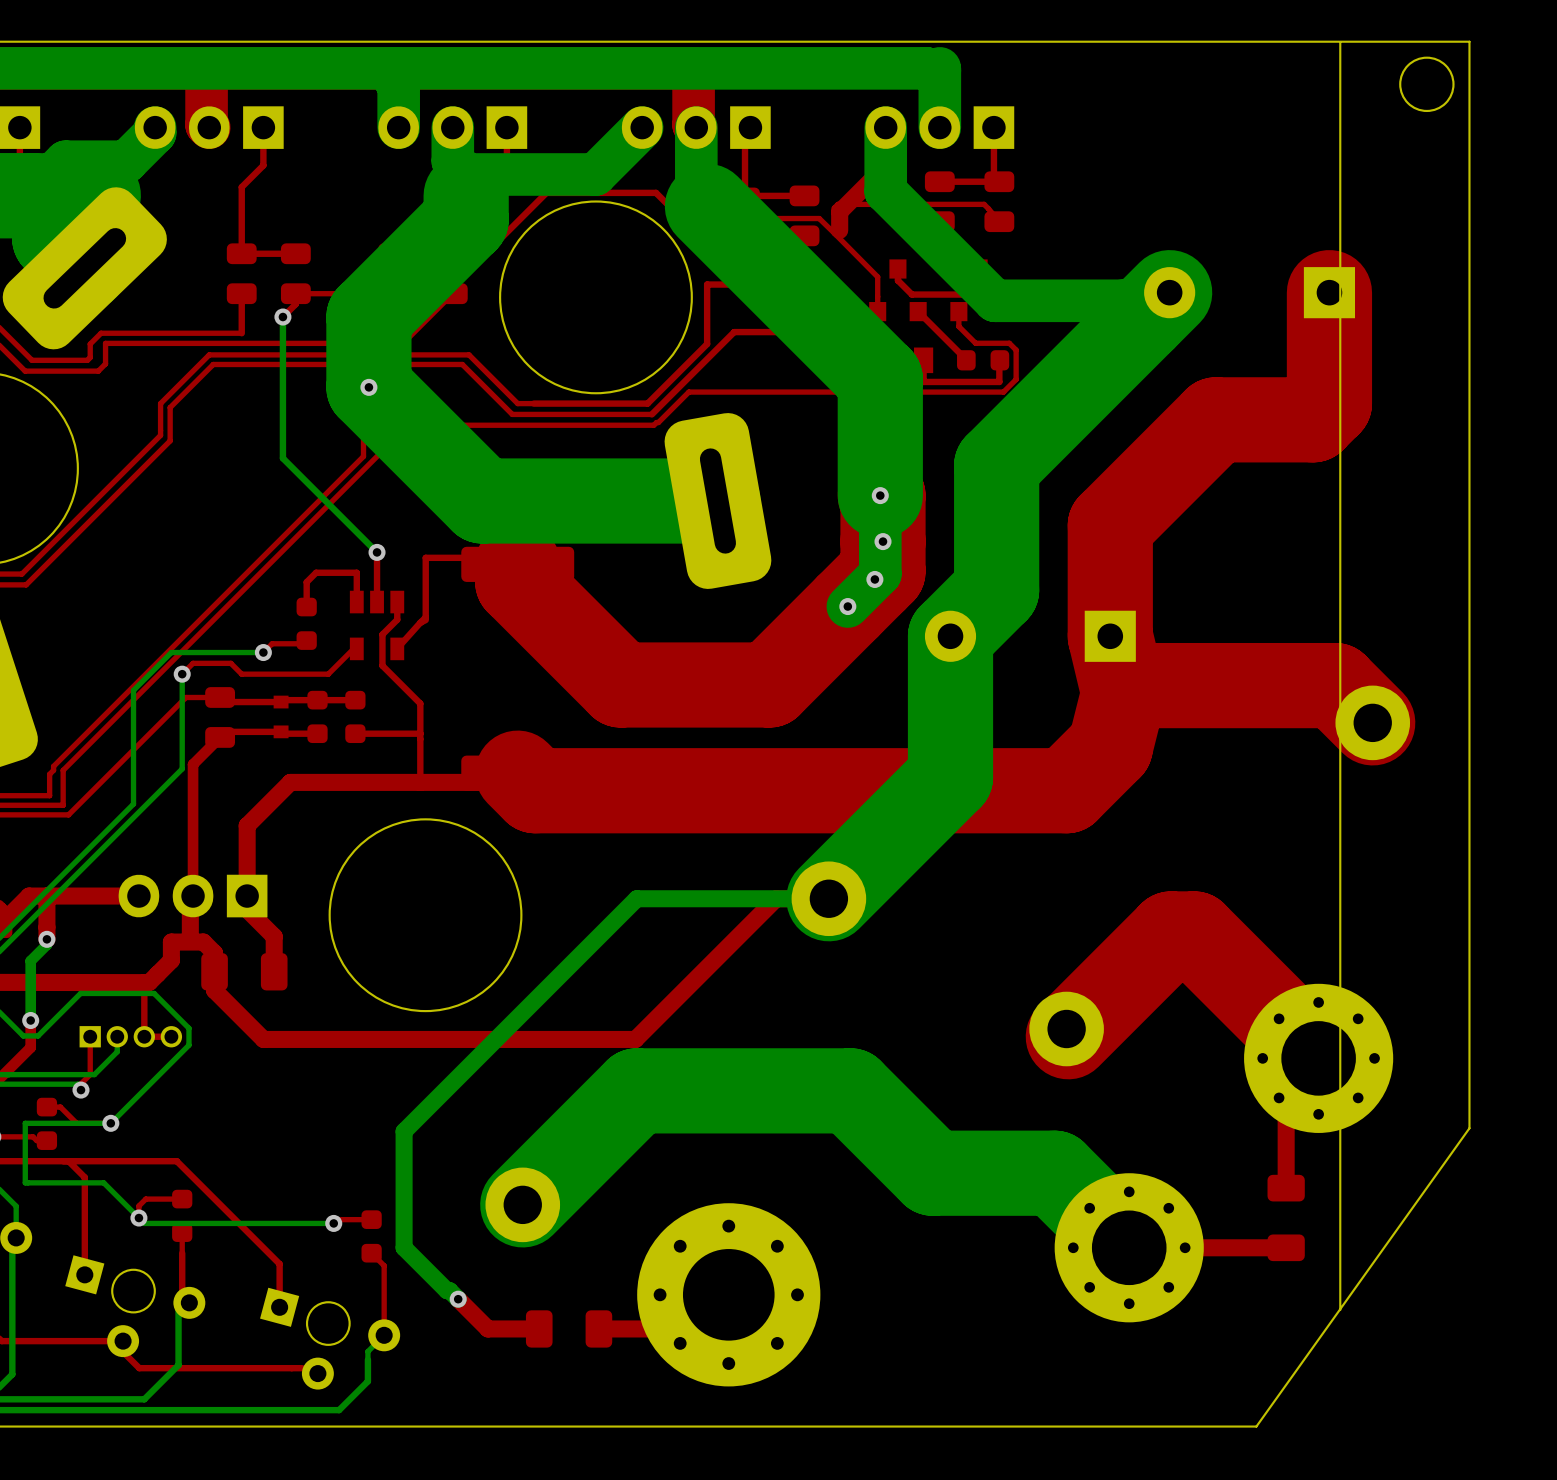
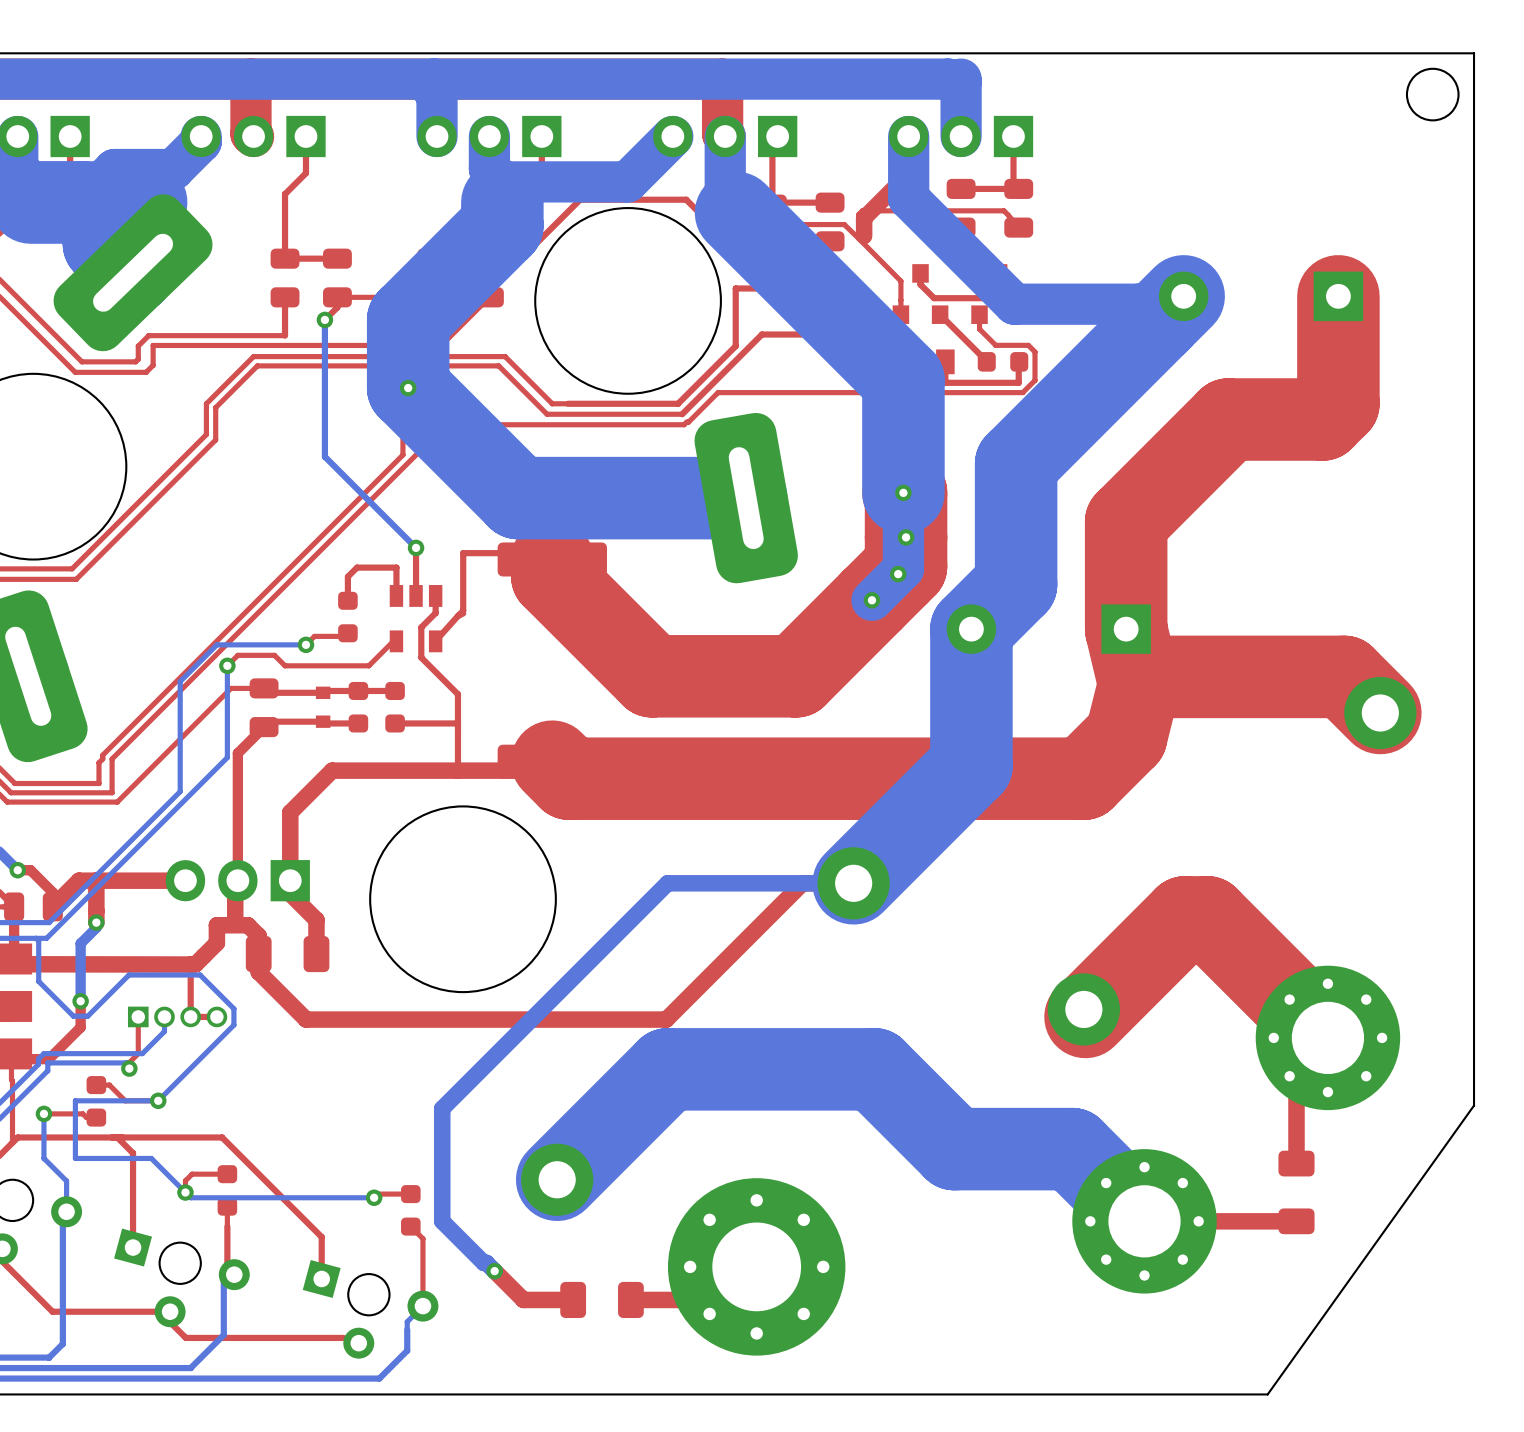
board edge: (1340, 42) (1340, 1310) -> none

